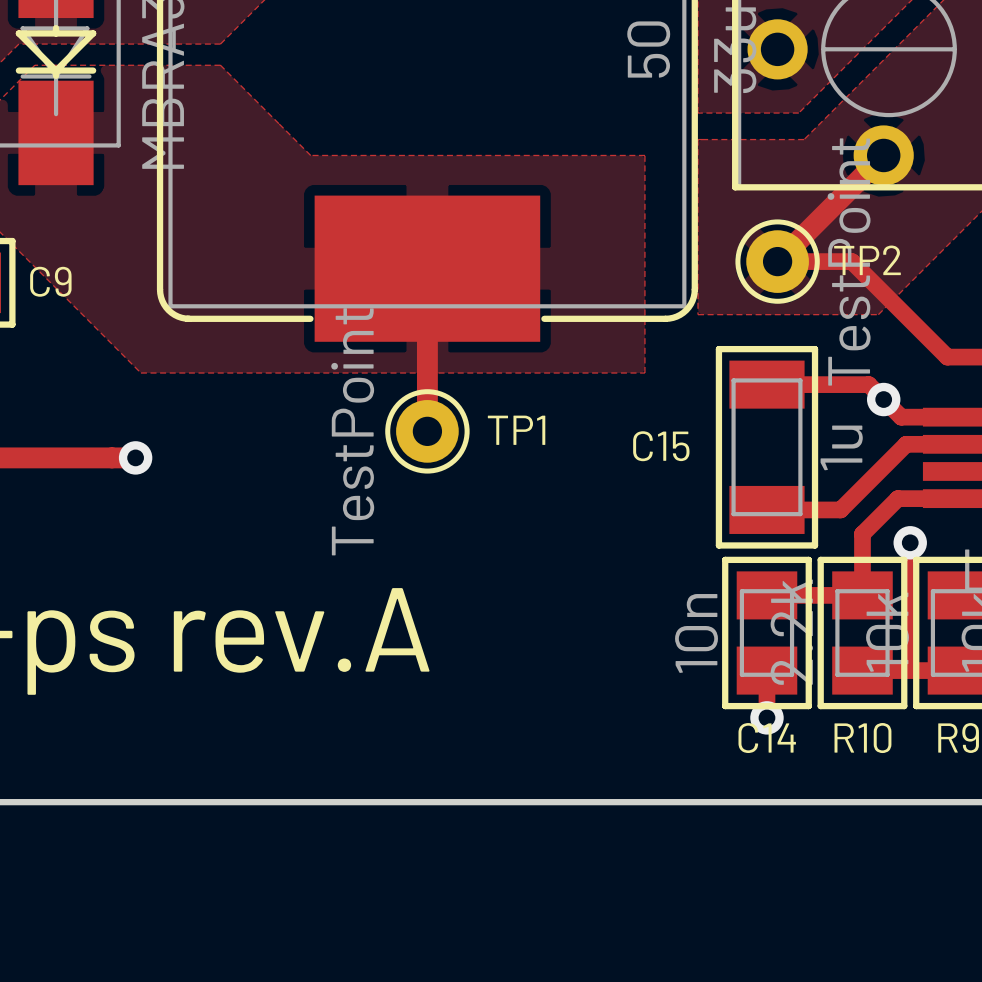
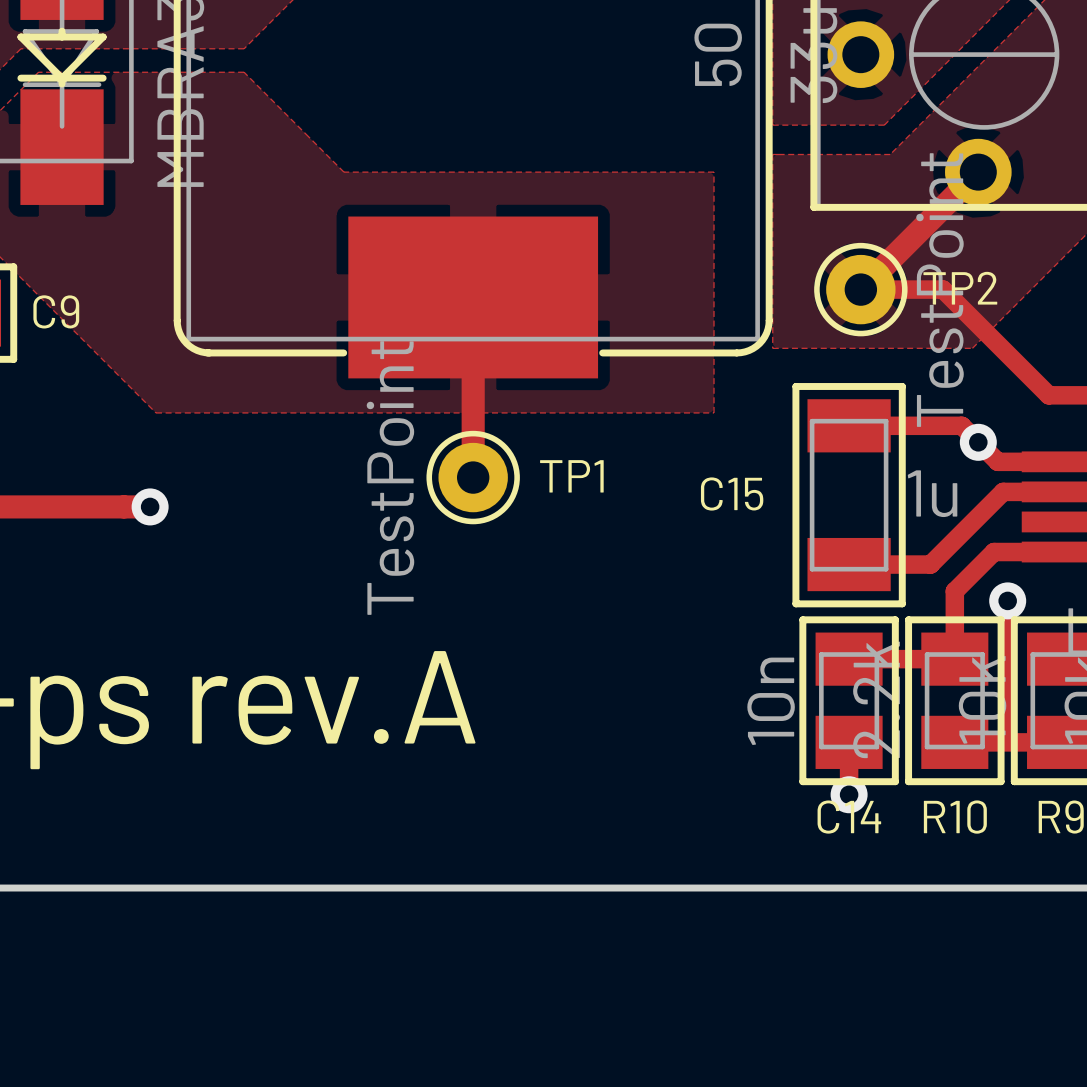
C15 value rotation: 0° (841, 447) -> 90° clockwise (932, 493)

